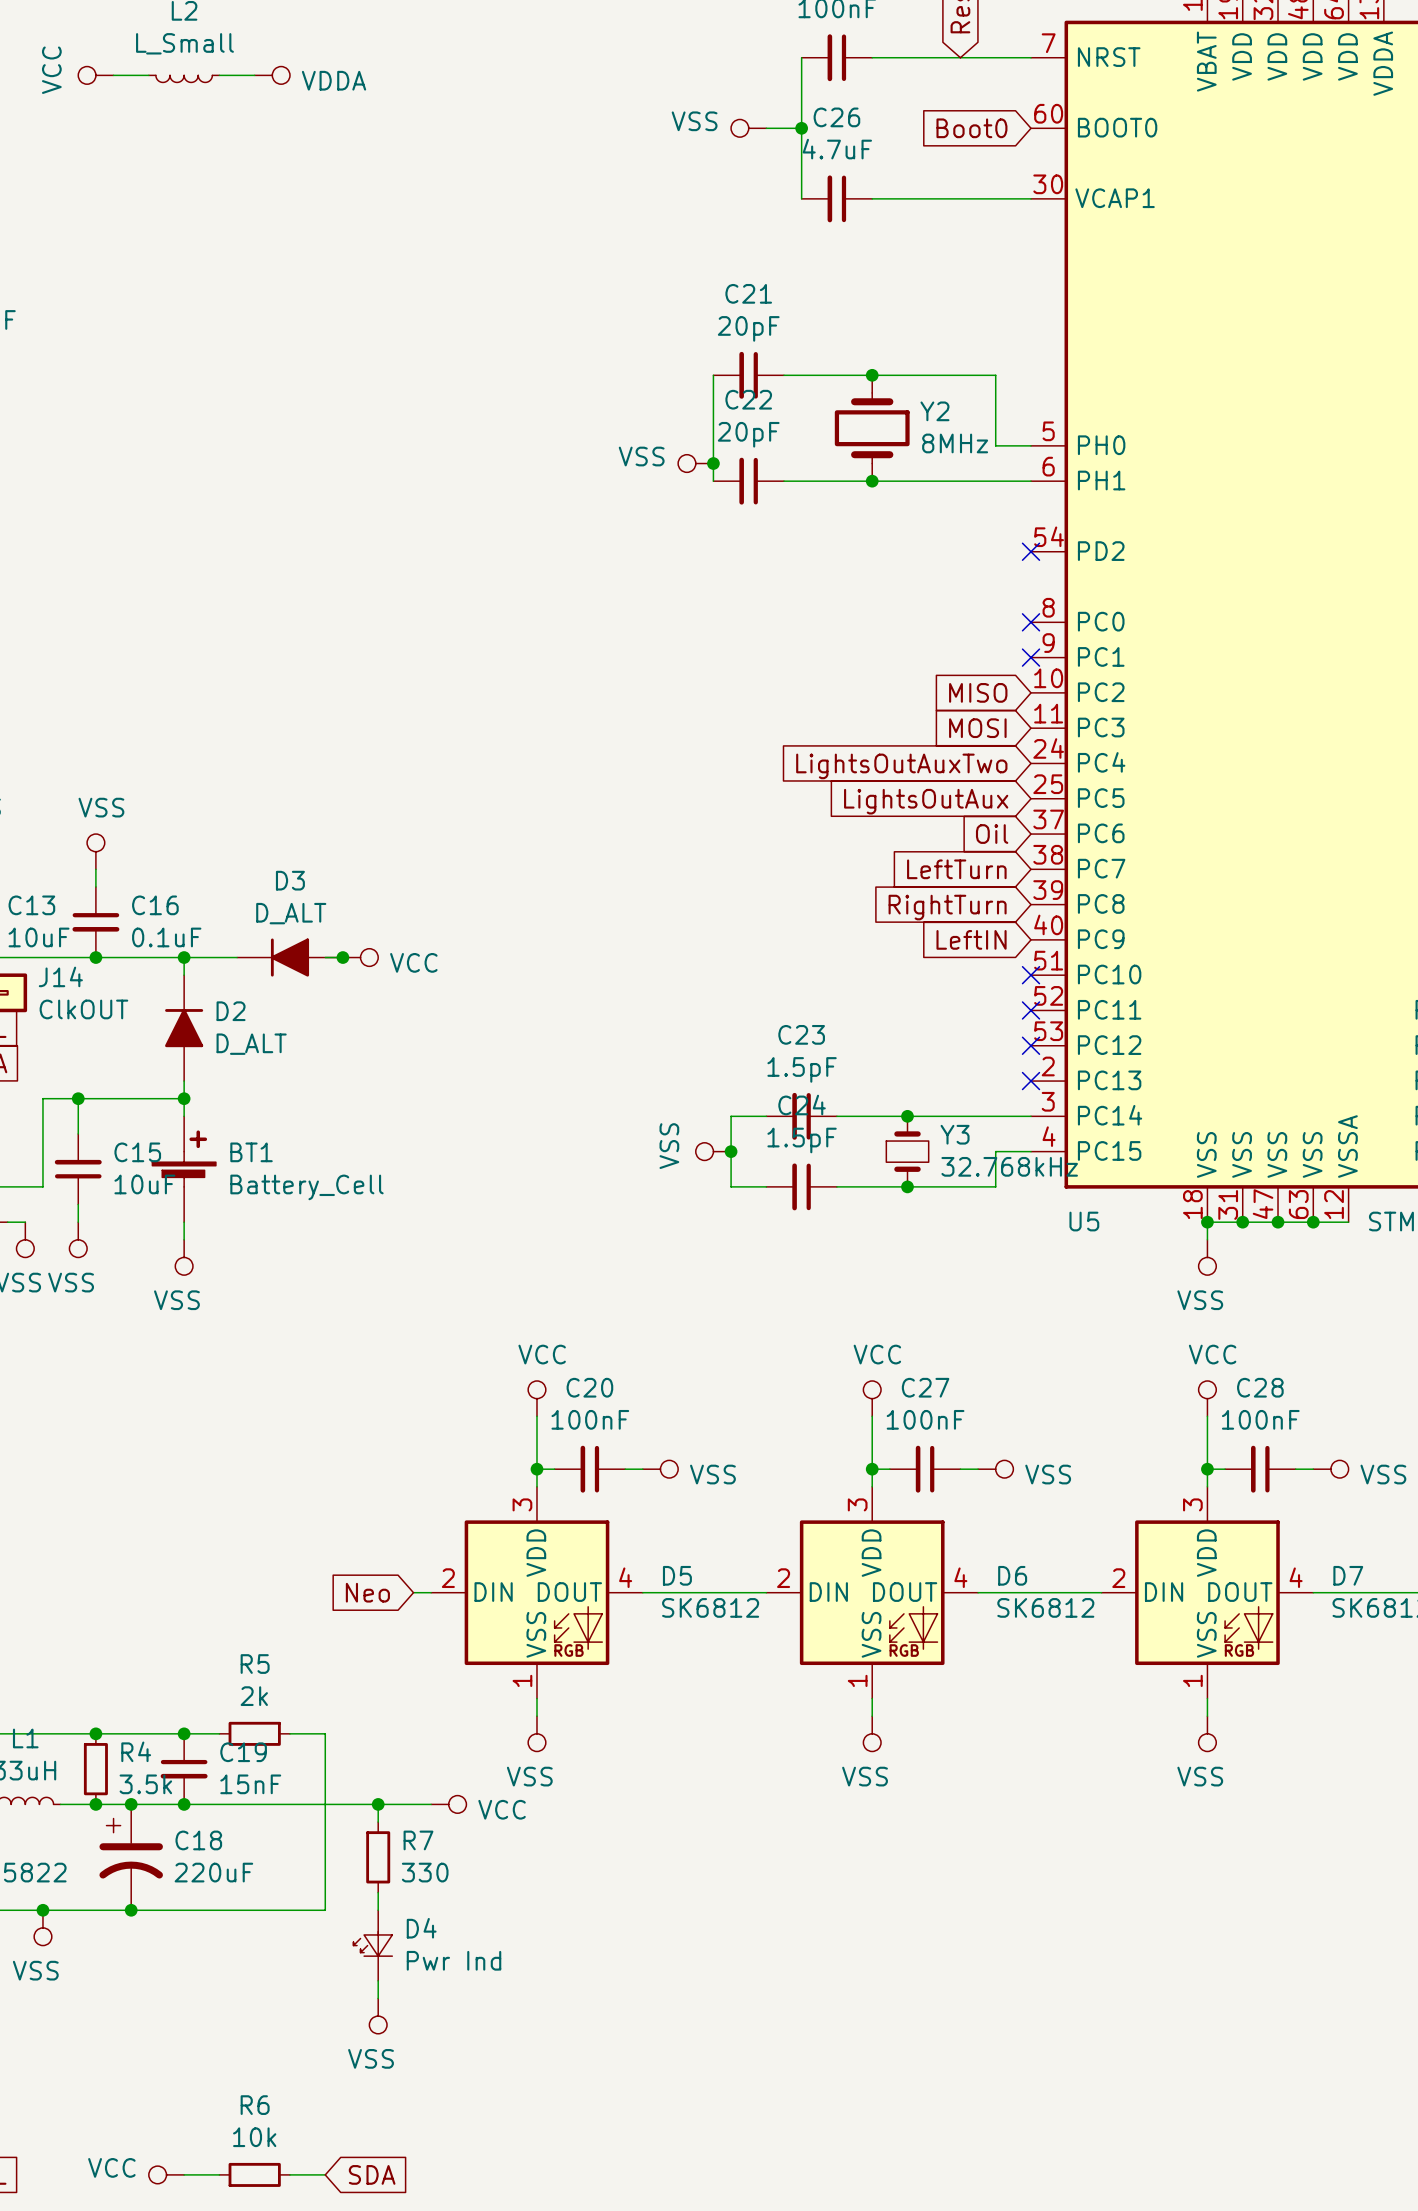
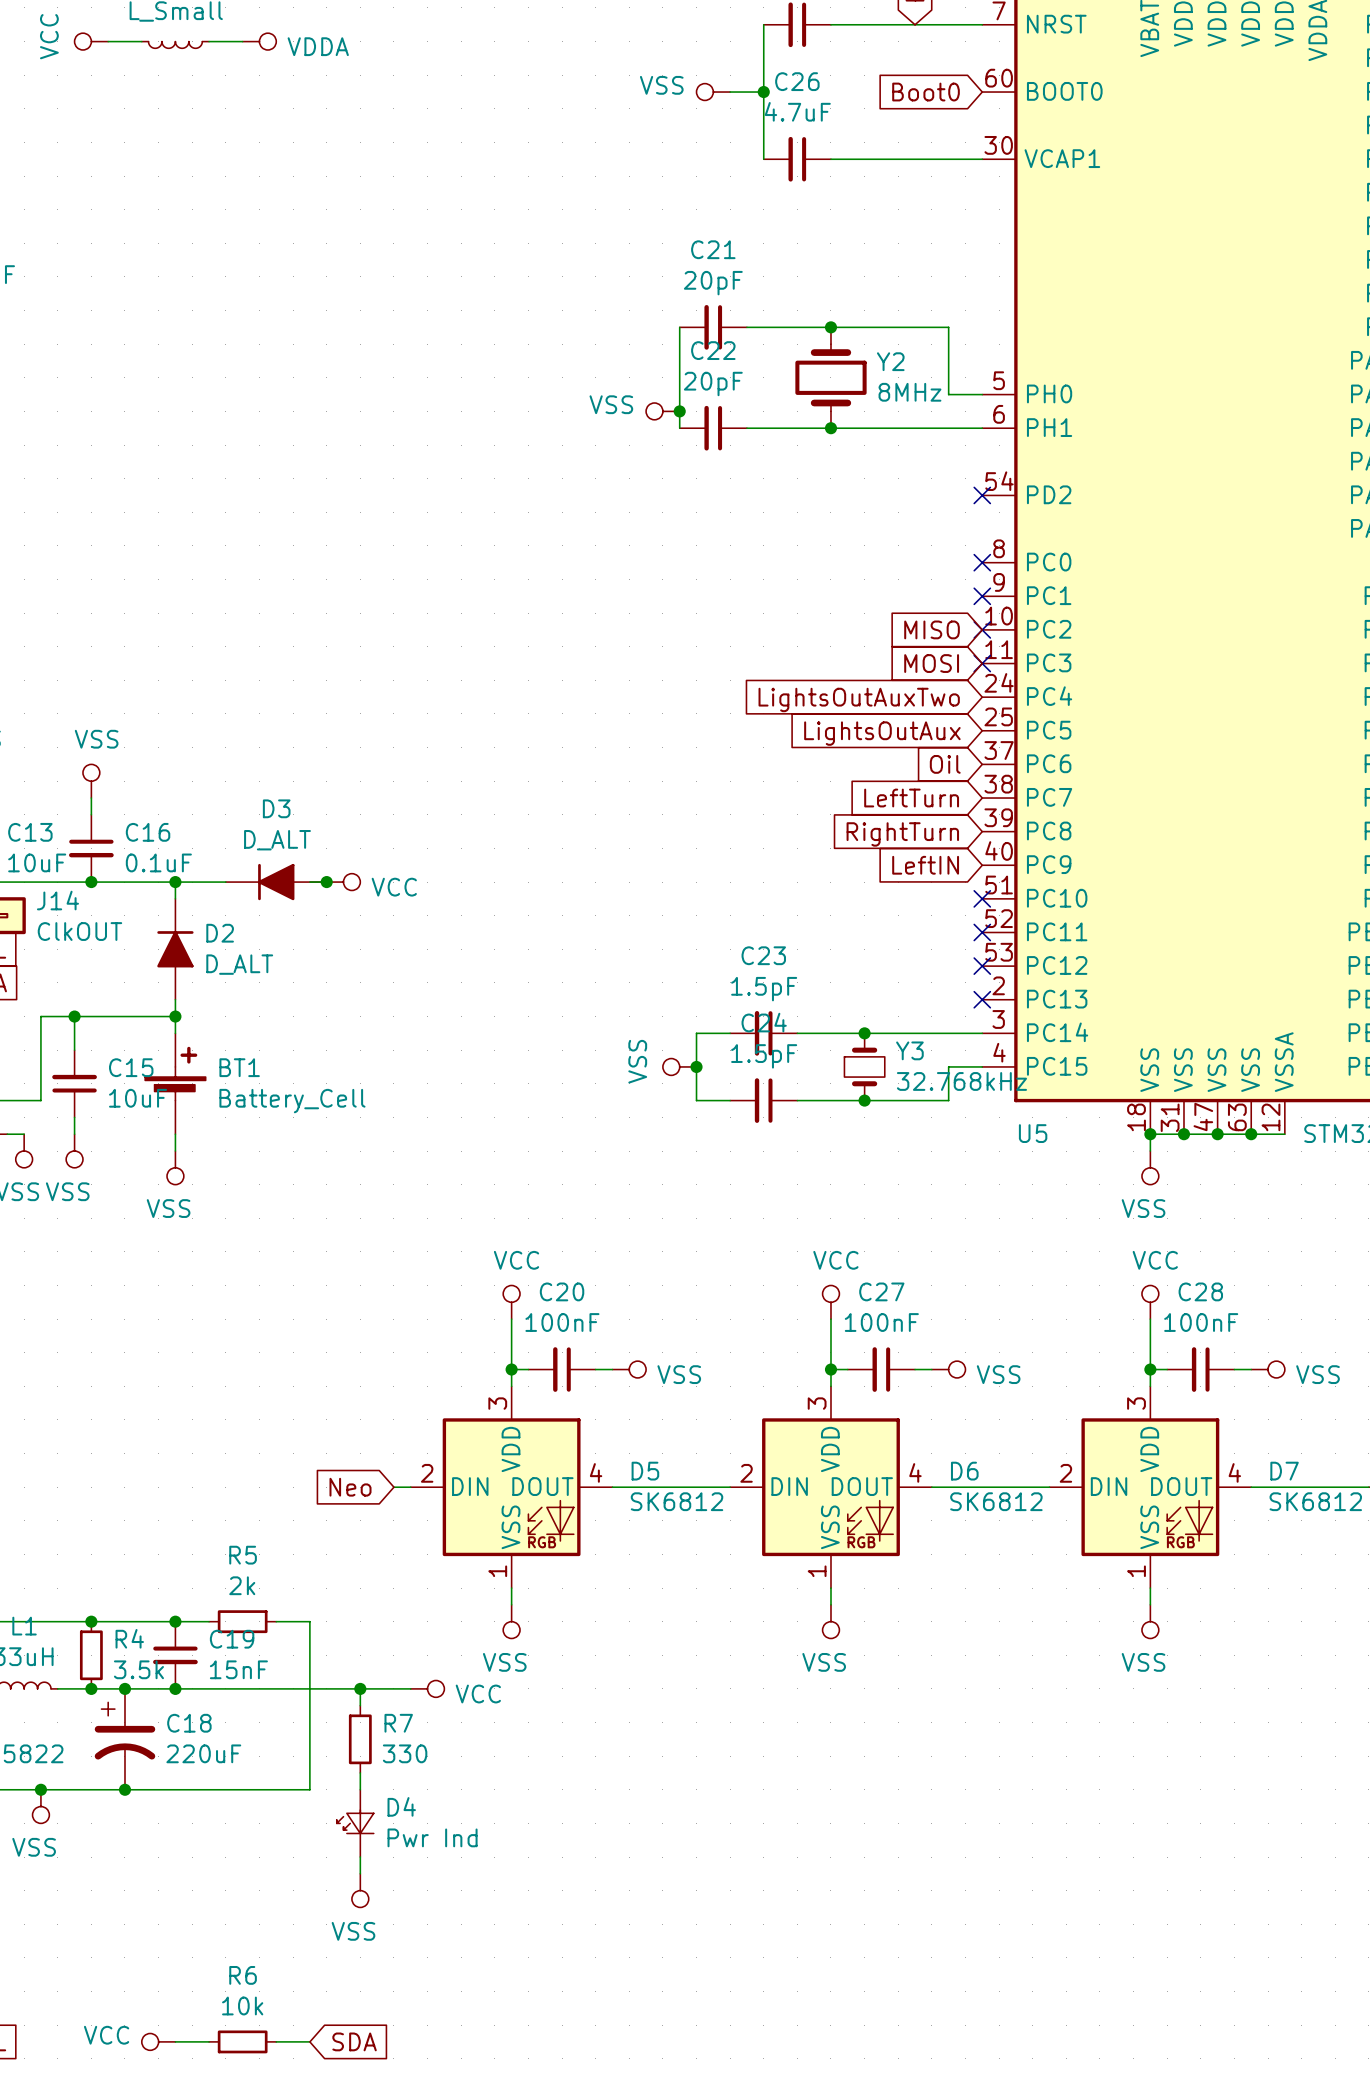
no-connect mark: none -> (982, 629)
no-connect mark: none -> (982, 663)

